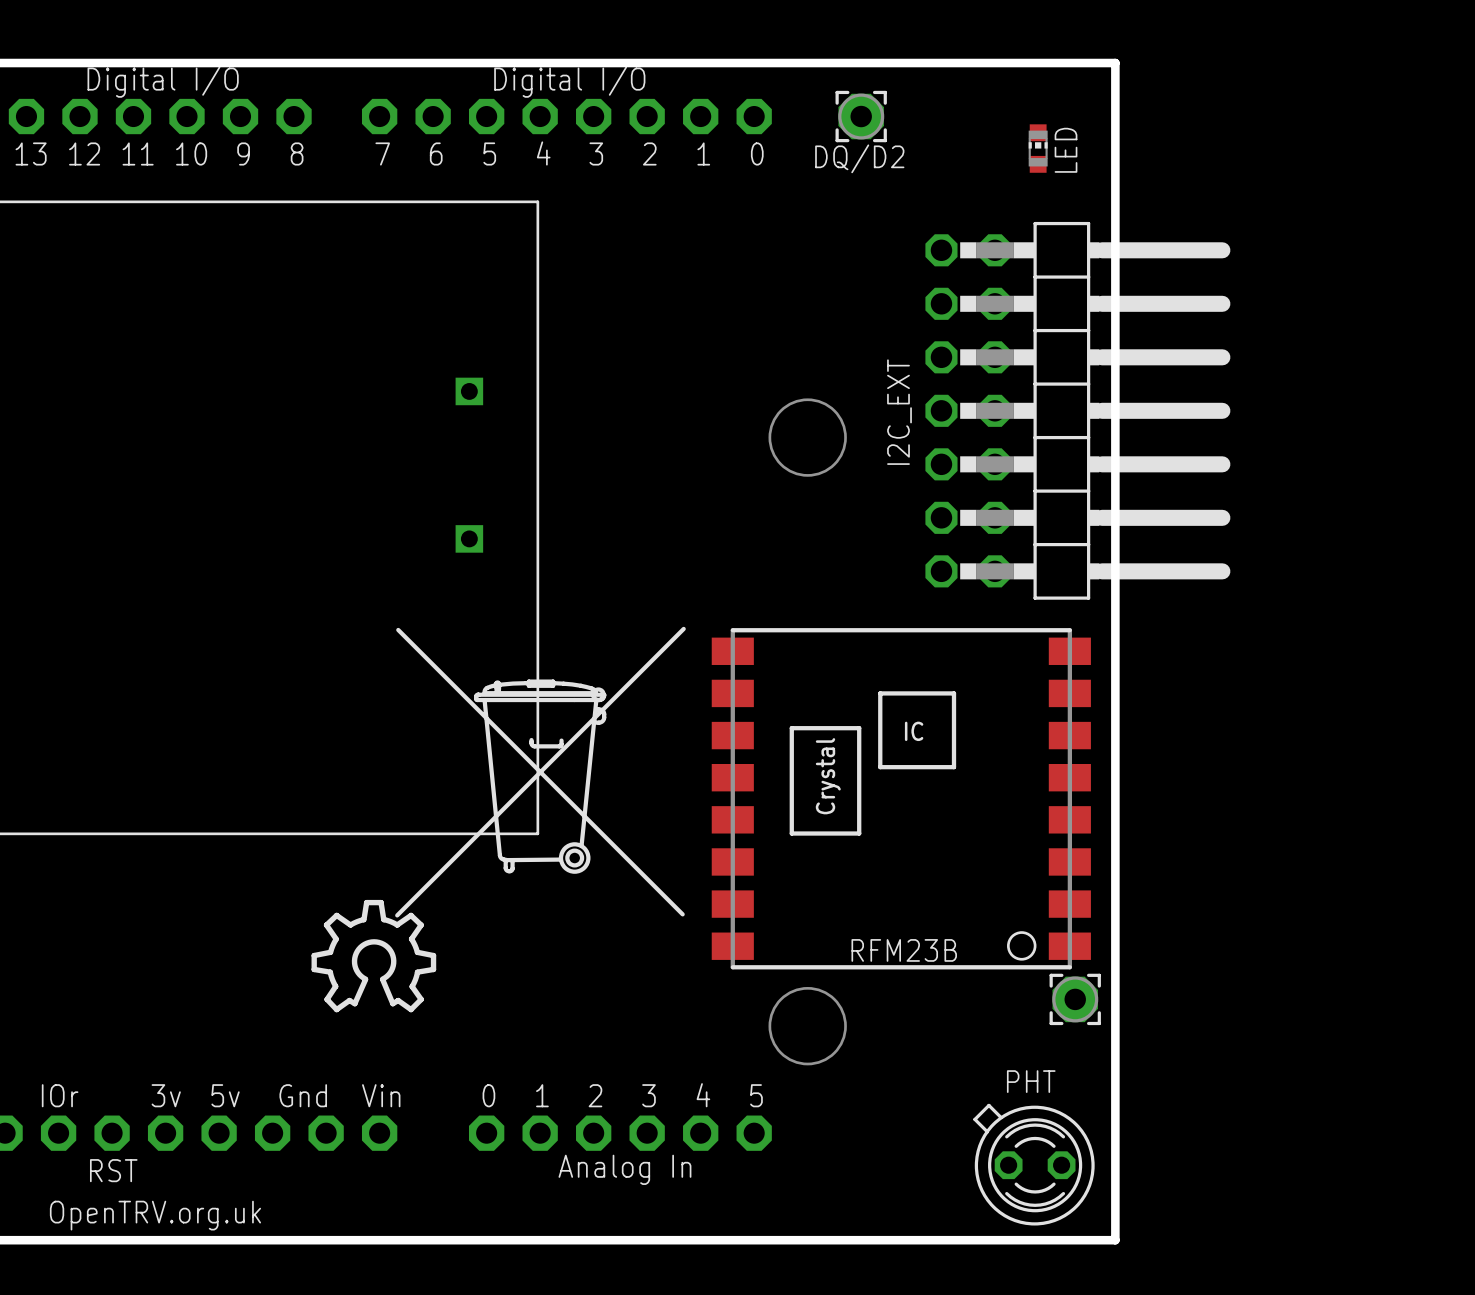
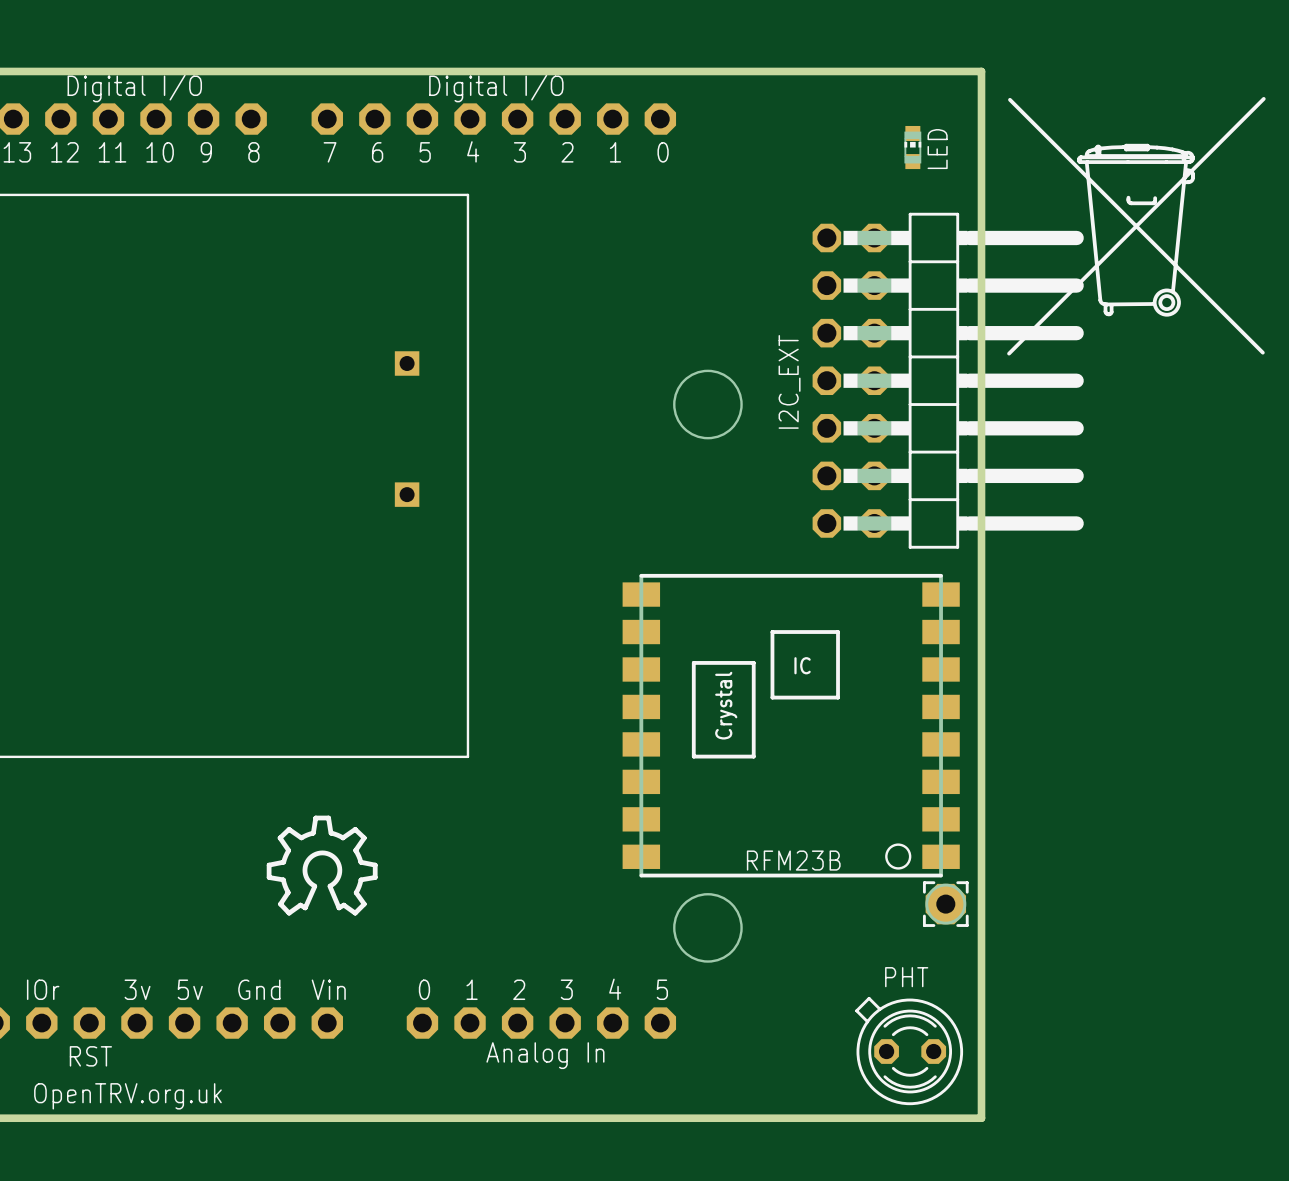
drawing: none -> [1007, 97, 1266, 356]
DQ/D2: (861, 116) -> none
drawing: [395, 626, 686, 918] -> none

